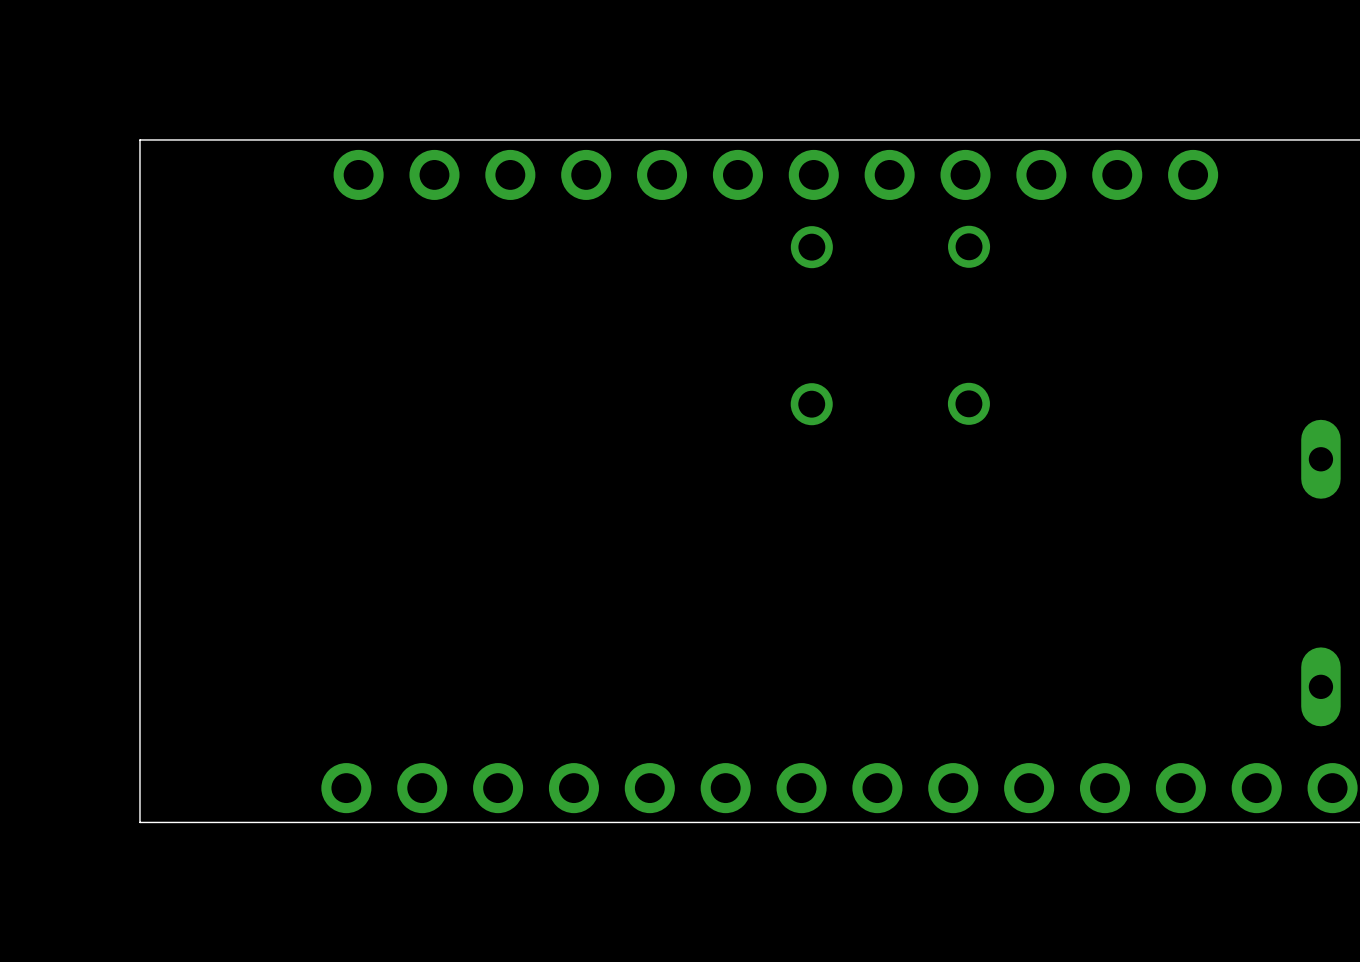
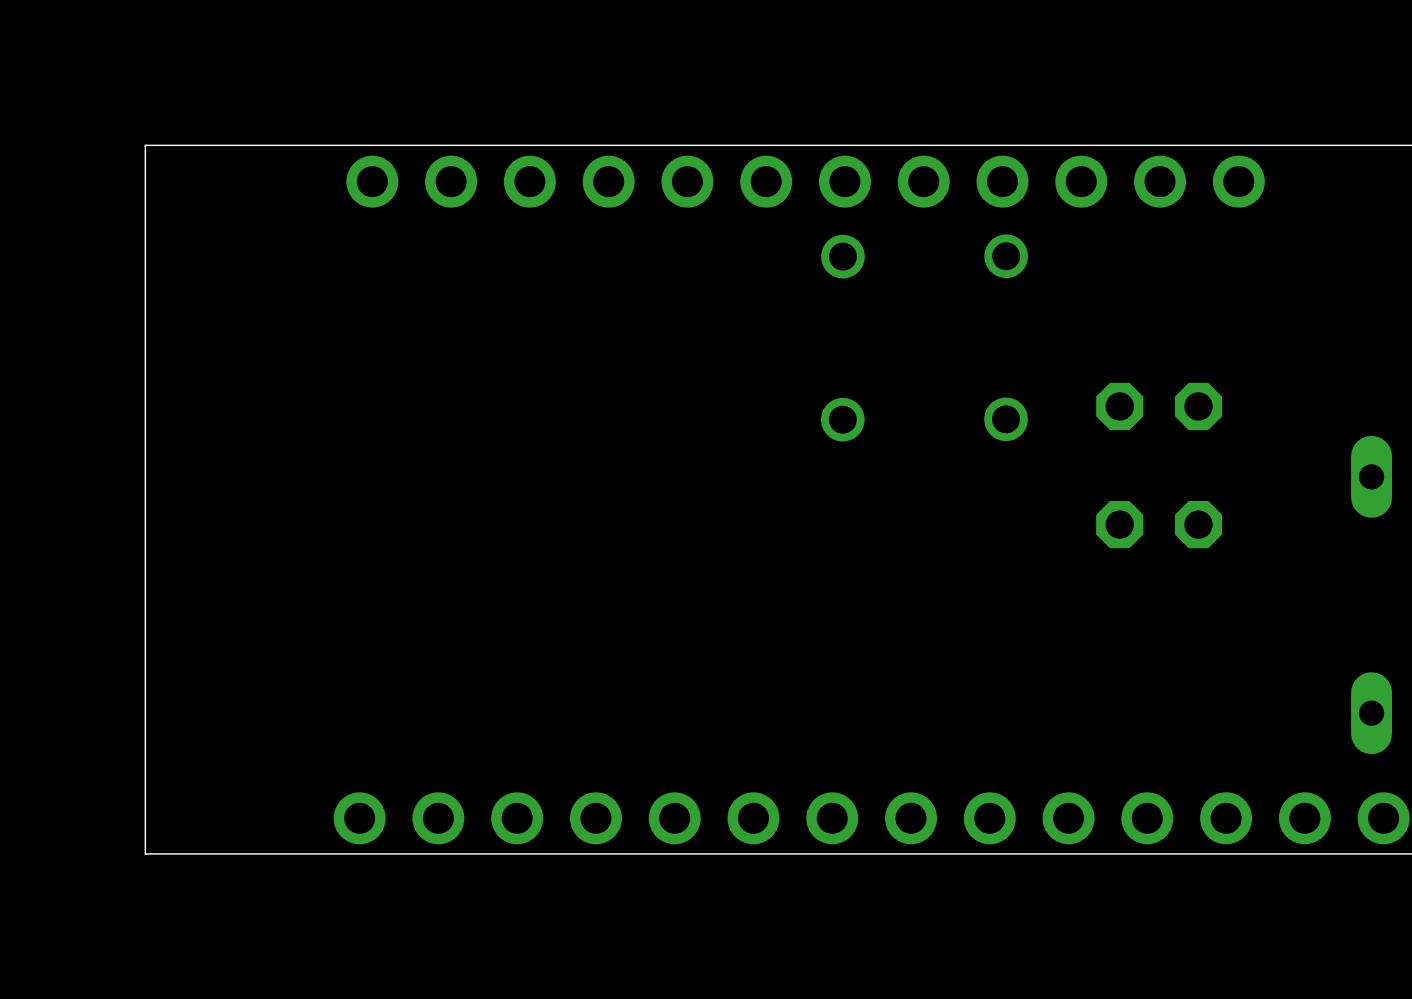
part: none -> (1159, 406)
part: none -> (1159, 524)

